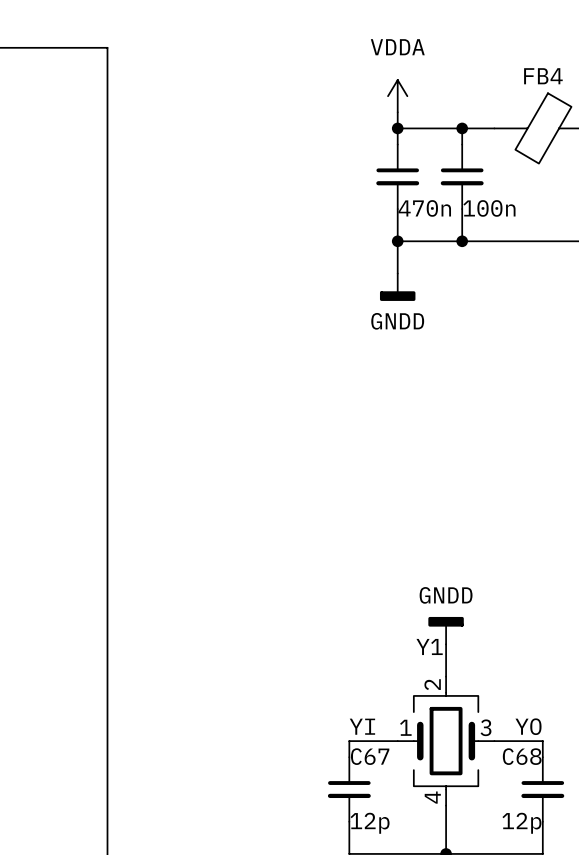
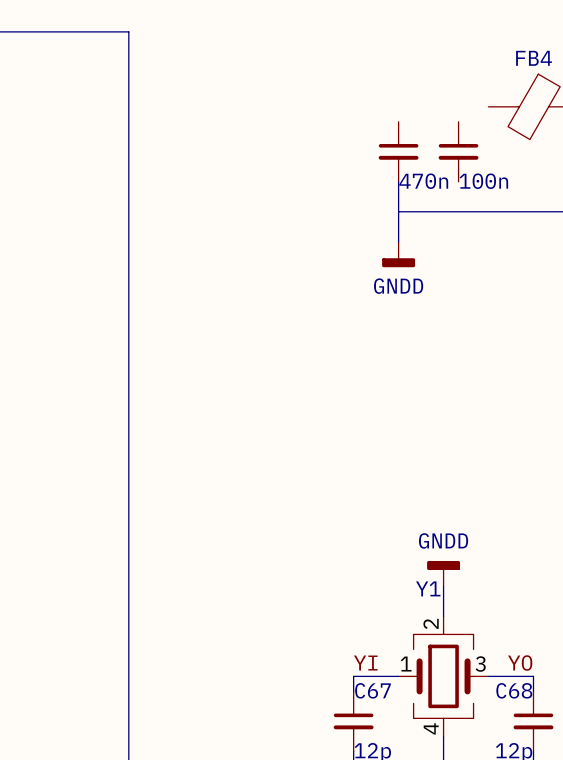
power symbol: VDDA (397, 96) -> none
wire: (397, 112) (397, 144) -> none
wire: (397, 128) (494, 128) -> none
junction: (397, 128) -> none
wire: (462, 128) (462, 144) -> none
junction: (462, 128) -> none
wire: (462, 209) (462, 241) -> none
junction: (397, 241) -> none
junction: (462, 241) -> none

